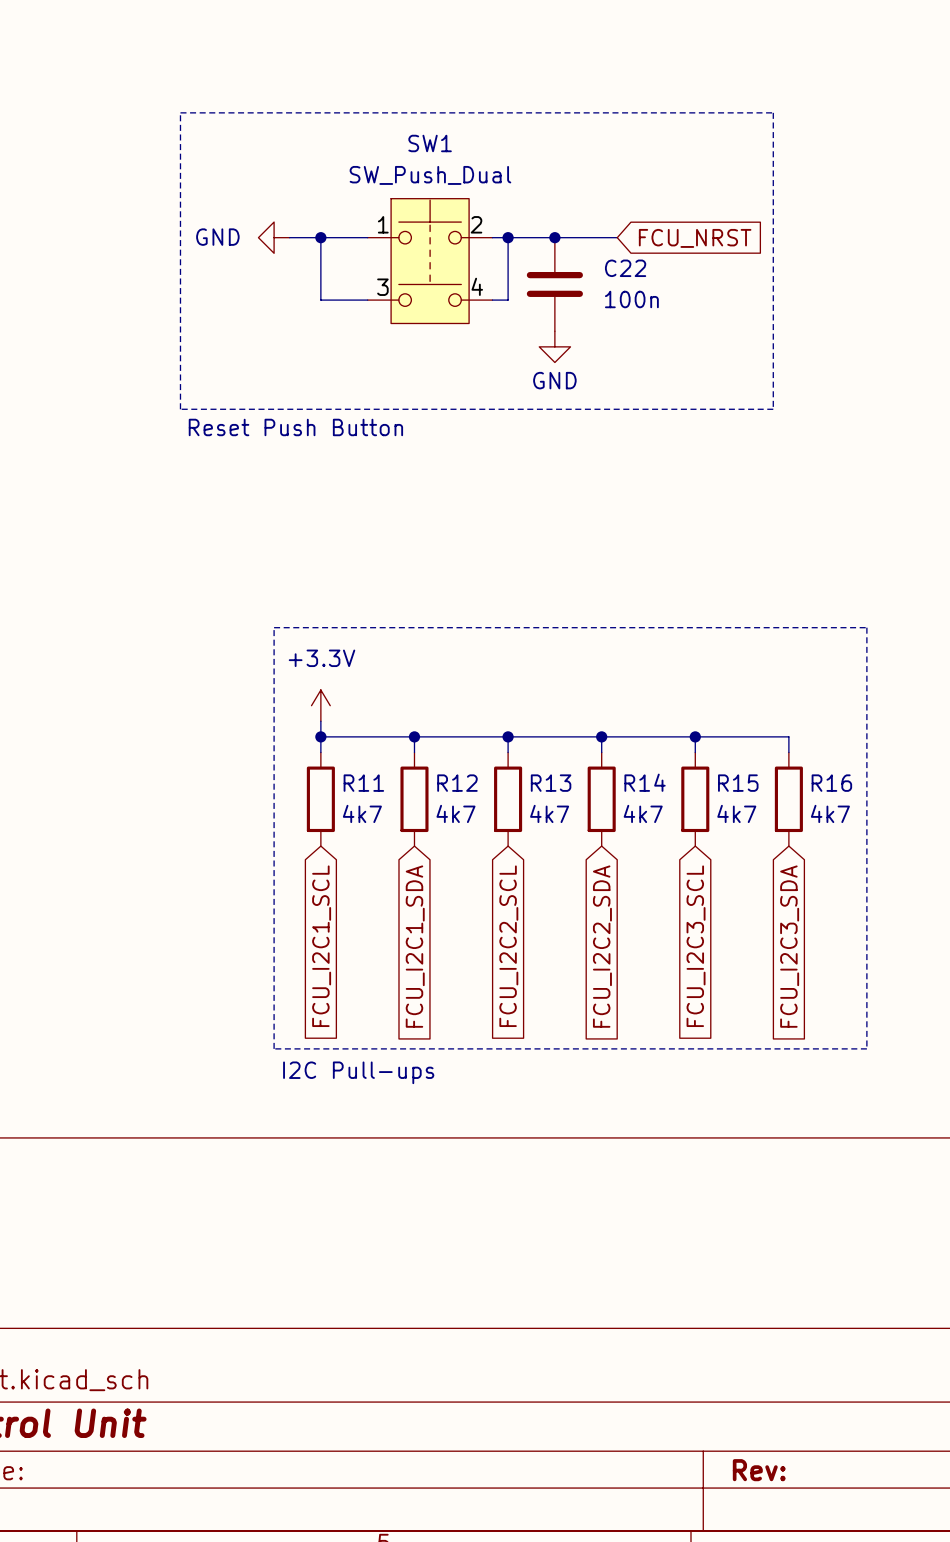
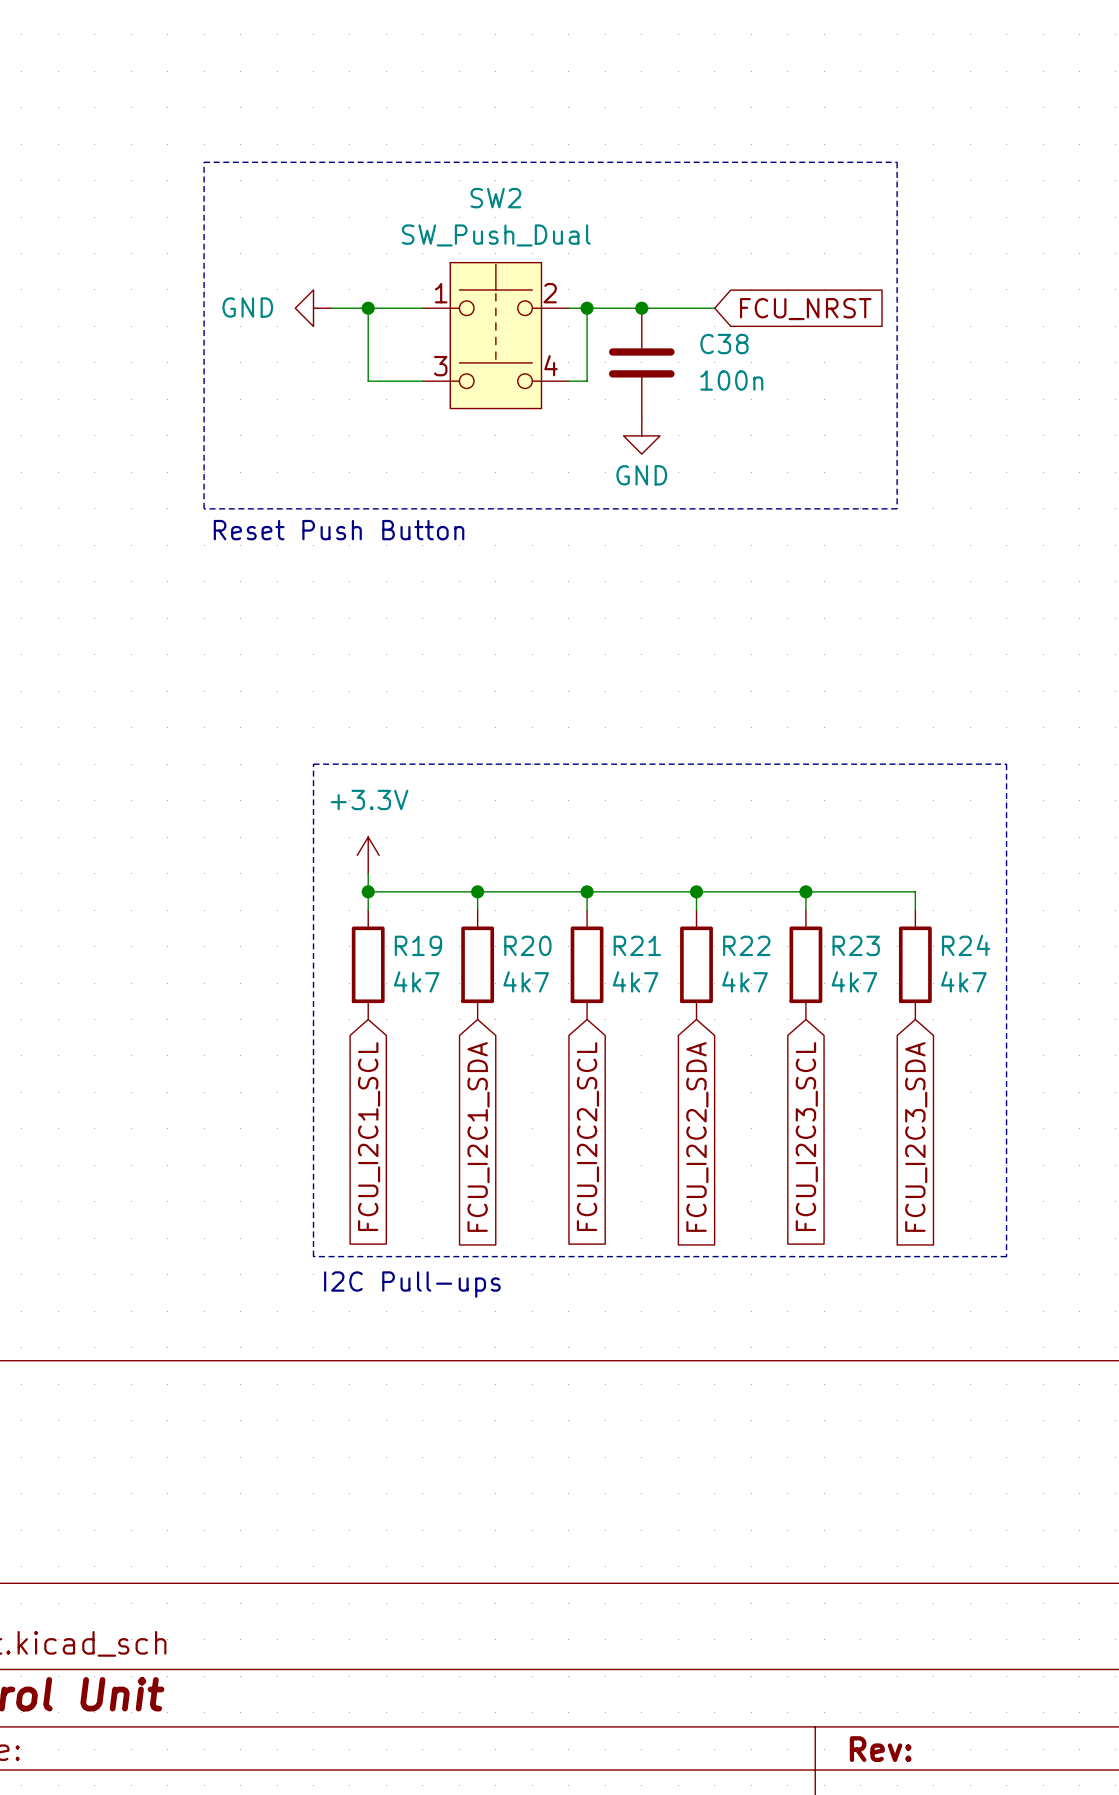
SW1 name: SW1 (430, 143) -> SW2 (495, 198)
C22 name: C22 (625, 268) -> C38 (724, 344)
R14 name: R14 (645, 782) -> R22 (746, 945)
R11 name: R11 (363, 783) -> R19 (418, 945)
R12 name: R12 (457, 783) -> R20 (527, 945)
R13 name: R13 (551, 783) -> R21 (637, 945)
R15 name: R15 (738, 783) -> R23 (856, 945)
R16 name: R16 (831, 783) -> R24 (966, 945)

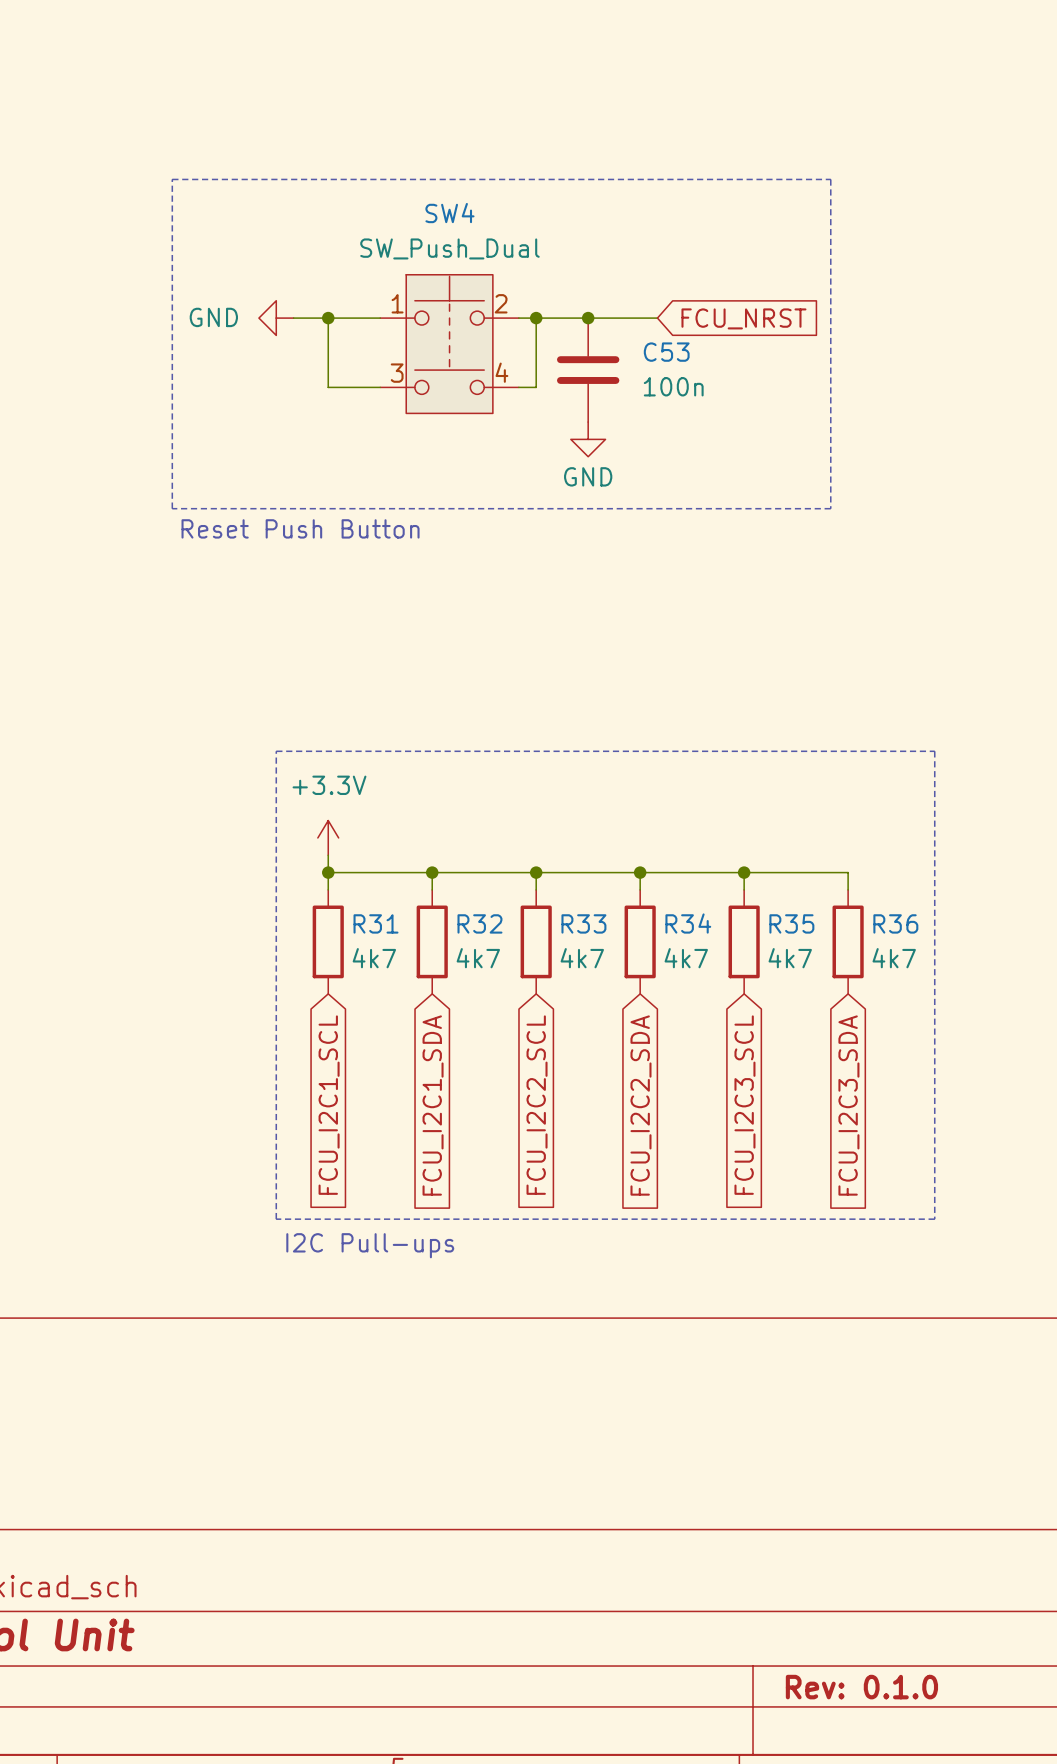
SW2 name: SW2 (495, 198) -> SW4 (449, 213)
C38 name: C38 (724, 344) -> C53 (666, 352)
R19 name: R19 (418, 945) -> R31 (375, 923)
R20 name: R20 (527, 945) -> R32 (479, 923)
R21 name: R21 (637, 945) -> R33 (583, 923)
R22 name: R22 (746, 945) -> R34 (688, 923)
R23 name: R23 (856, 945) -> R35 (791, 923)
R24 name: R24 (966, 945) -> R36 (895, 923)
title block: Rev: (880, 1749) -> Rev: 0.1.0 (861, 1687)

